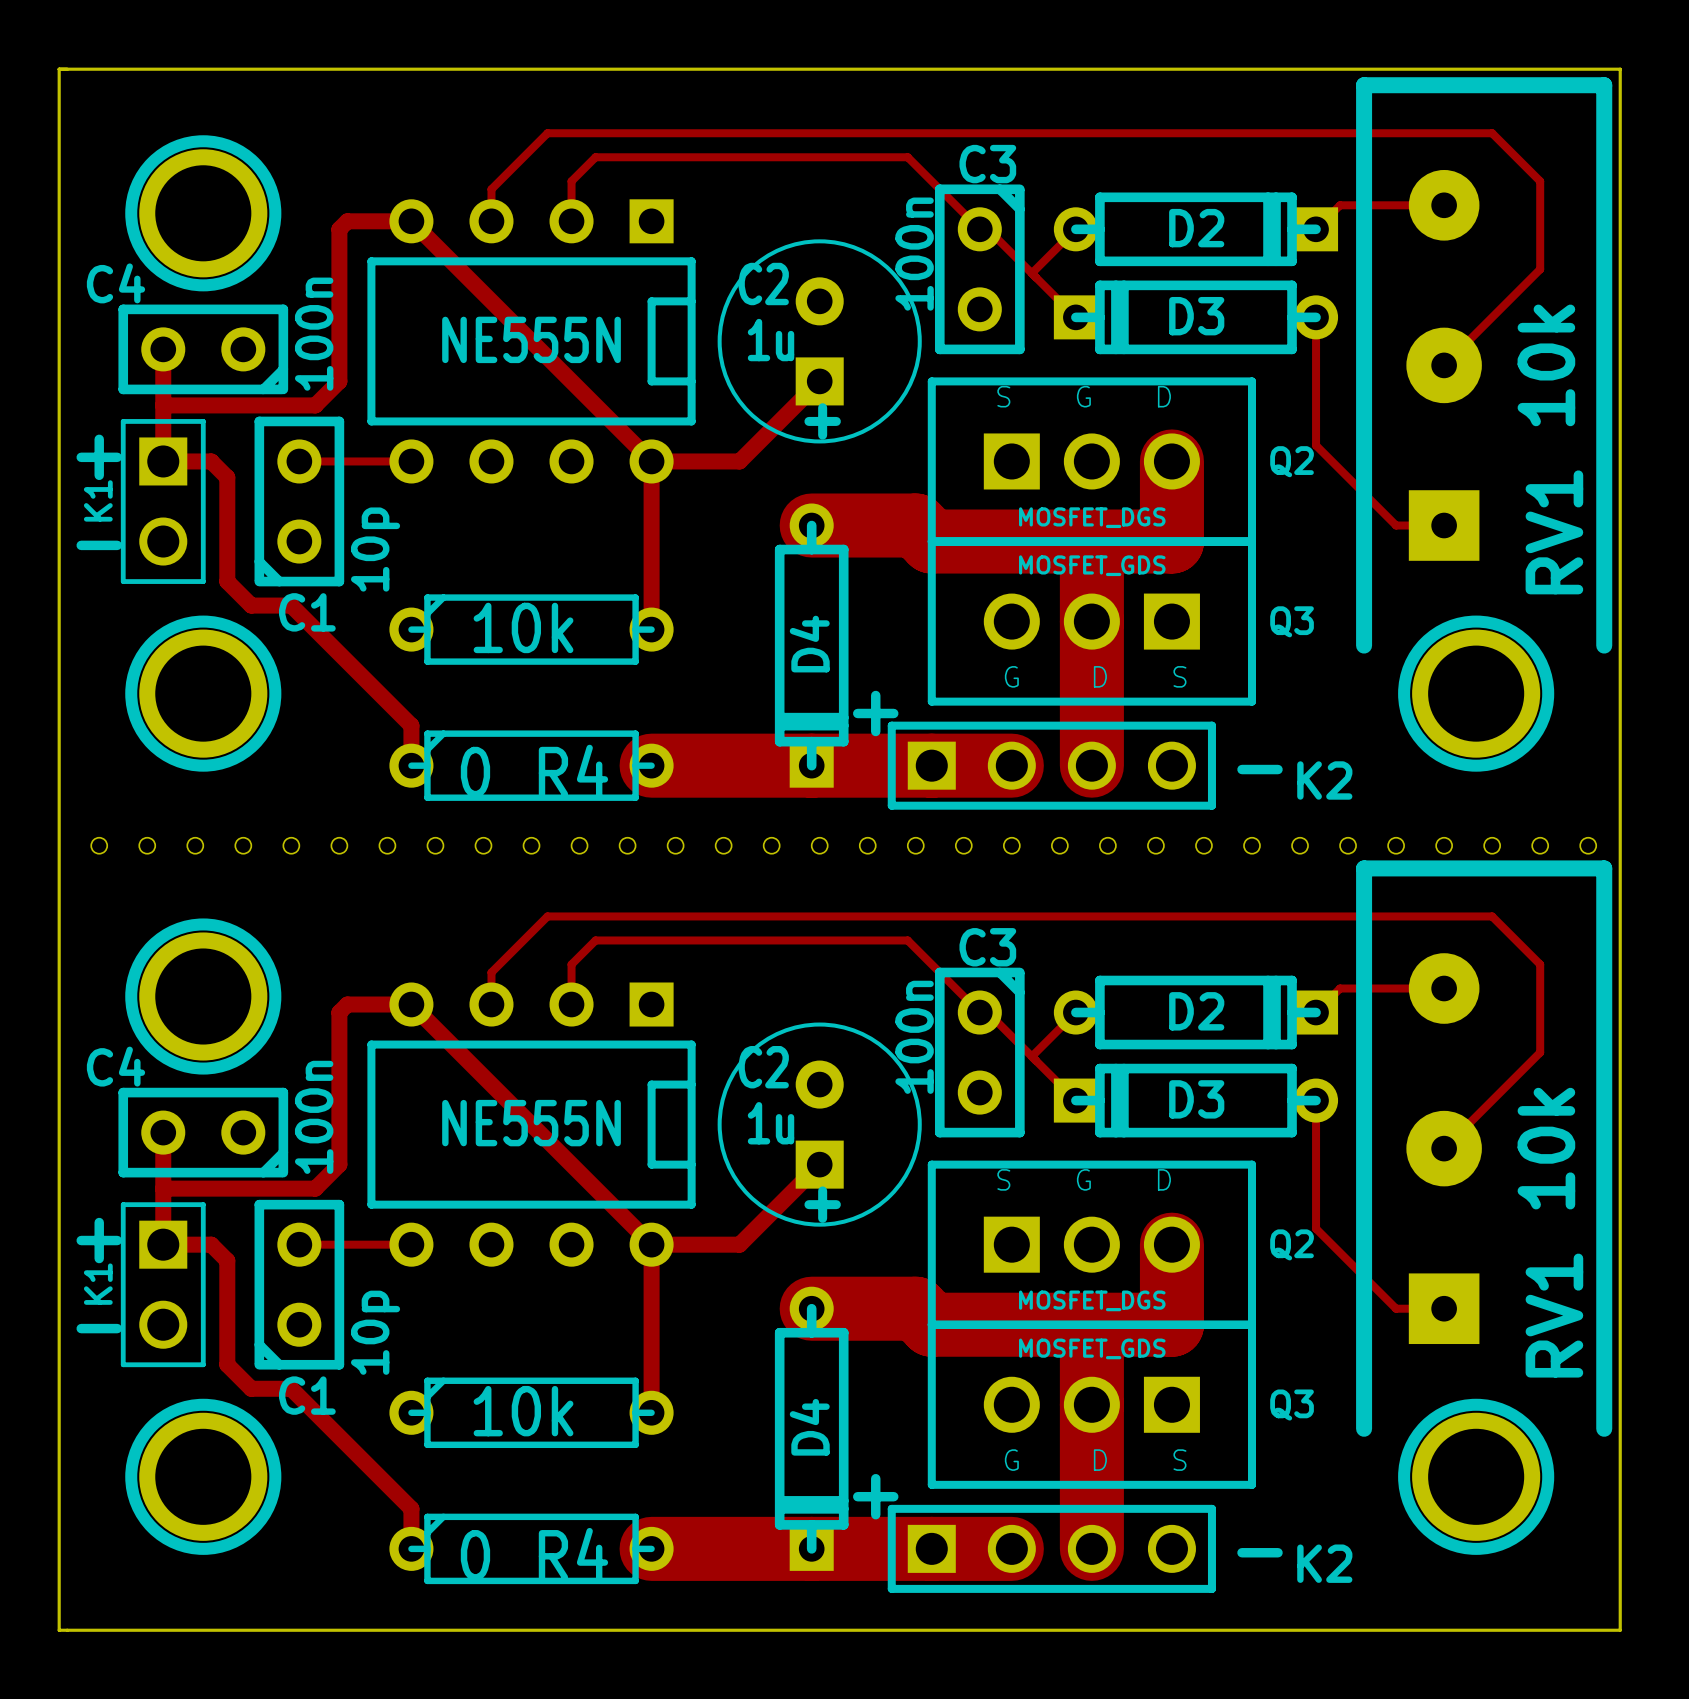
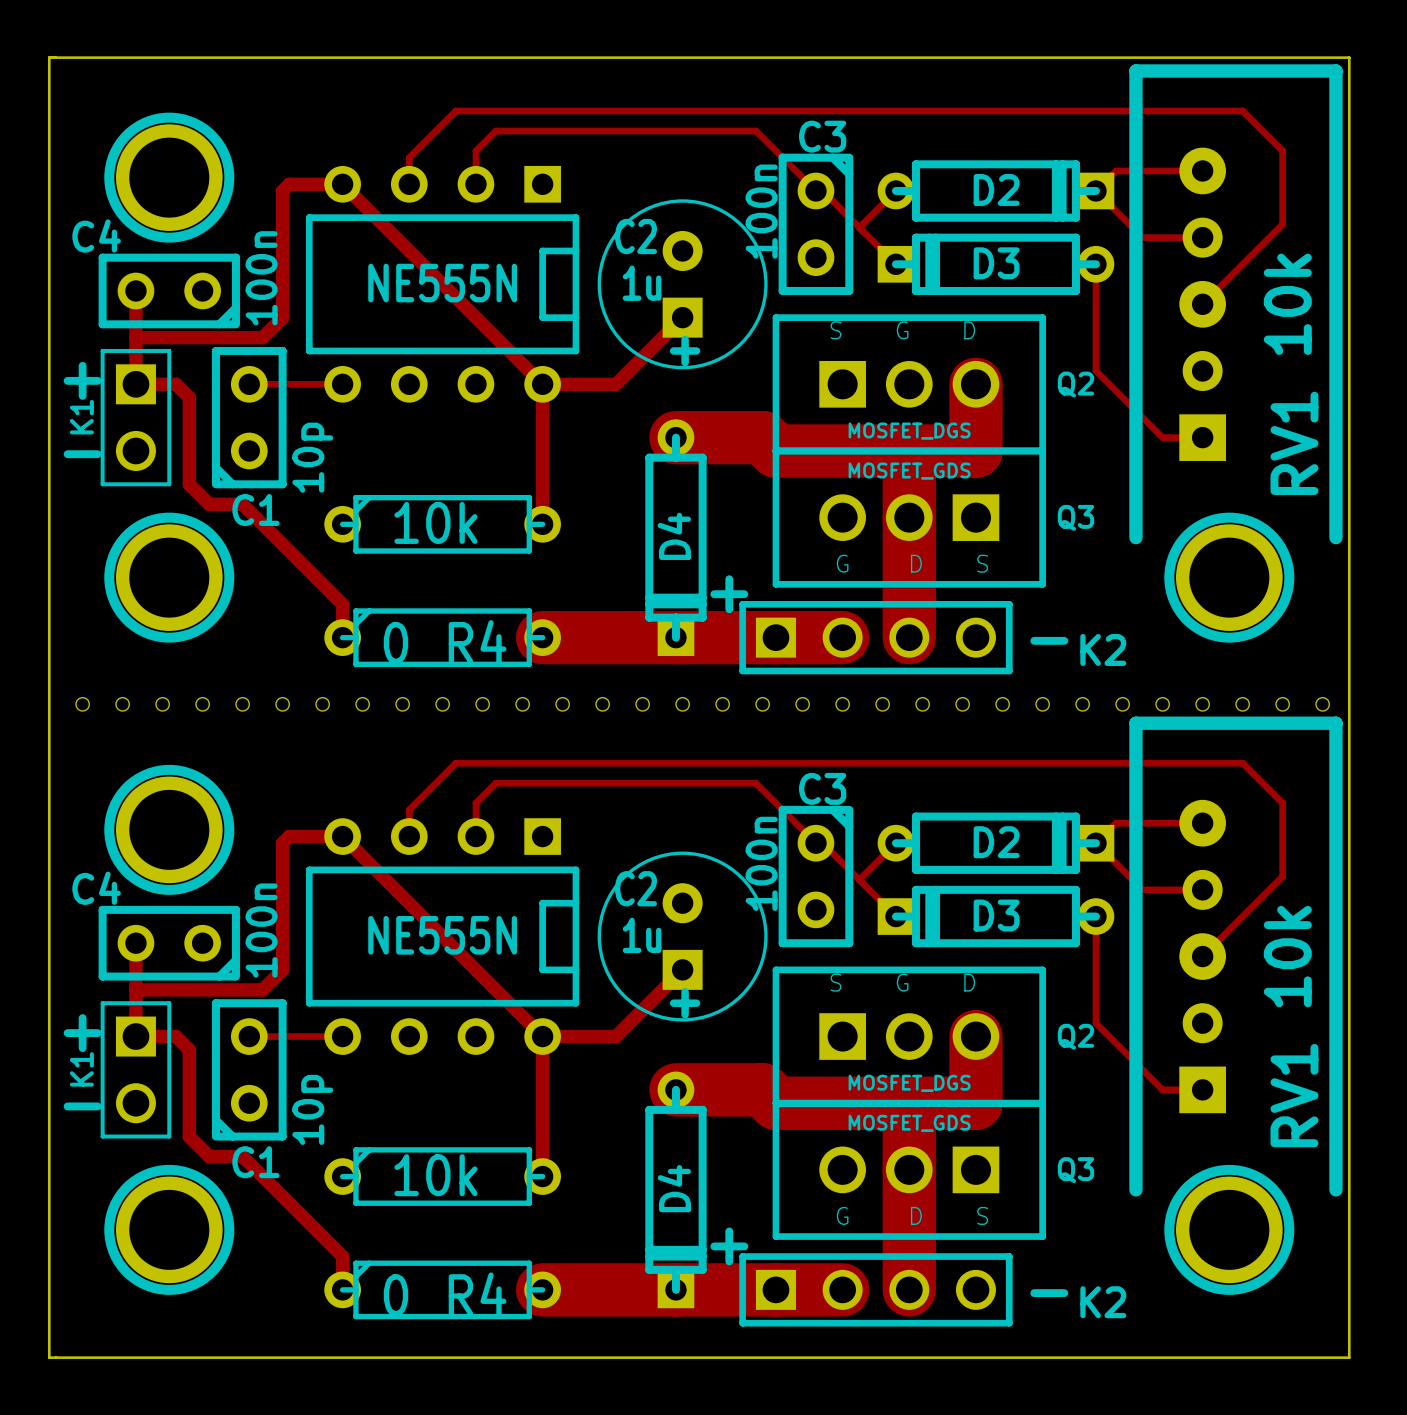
RV1 footprint: [1356, 77, 1613, 654] -> [1129, 64, 1343, 545]
track: none -> (1095, 190) (1142, 237) (1202, 237)
RV1 footprint: [1356, 860, 1613, 1437] -> [1129, 716, 1343, 1197]
track: none -> (1095, 843) (1142, 889) (1202, 889)

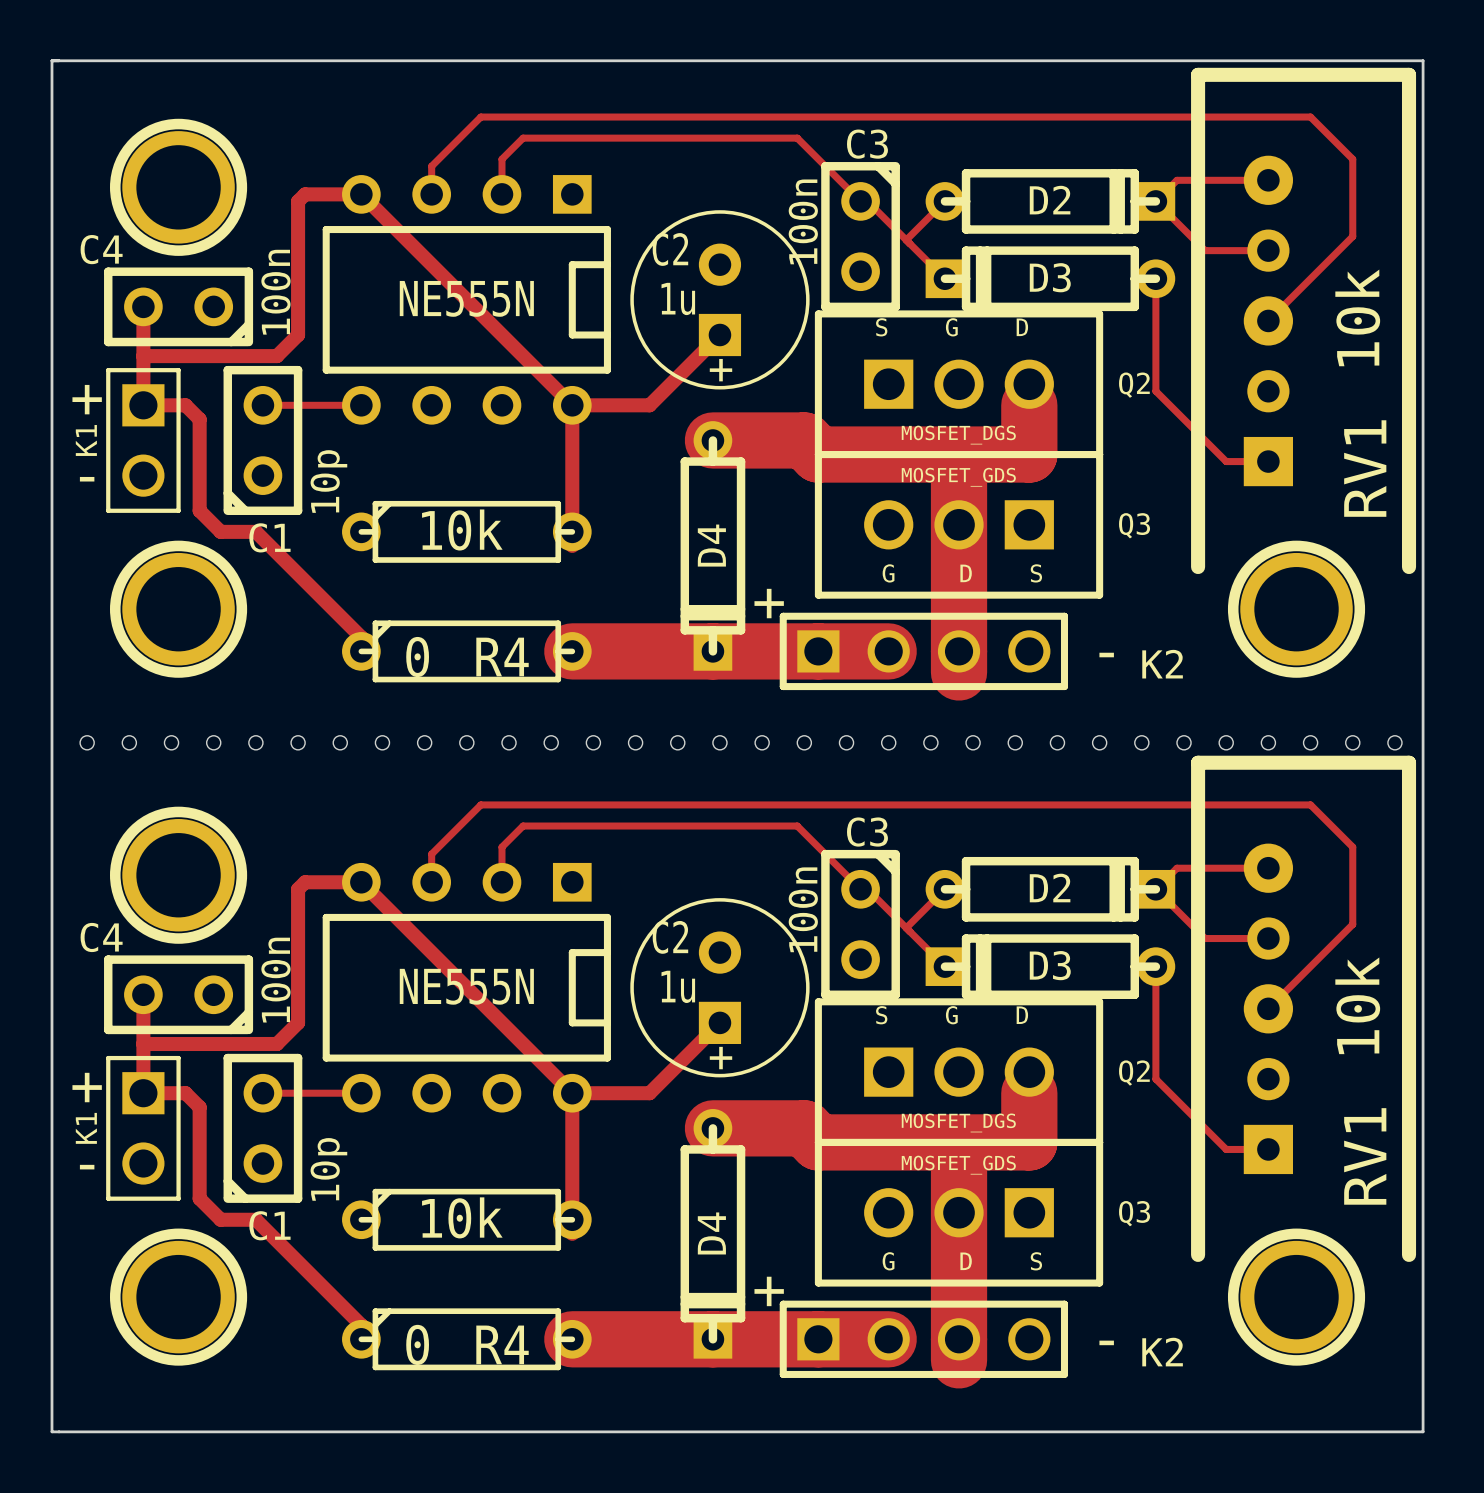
Q2 position: (909, 384) -> (959, 384)
track: (975, 430) (975, 450) (775, 450) (762, 437) (675, 437) -> (1029, 454) (818, 454) (804, 440) (712, 440)
Q3 position: (909, 517) -> (959, 524)
part position: (442, 524) -> (466, 531)
D4 position: (675, 537) -> (712, 545)
text position: + (729, 594) -> + (769, 603)
R4 position: (442, 637) -> (466, 651)
track: (542, 637) (842, 637) -> (572, 651) (888, 651)
K2 position: (875, 637) -> (923, 651)
text position: - (1049, 640) -> - (1106, 655)
Q2 position: (909, 1036) -> (959, 1072)
track: (975, 1083) (975, 1103) (775, 1103) (762, 1089) (675, 1089) -> (1029, 1142) (818, 1142) (804, 1128) (712, 1128)
Q3 position: (909, 1169) -> (959, 1212)
part position: (442, 1176) -> (466, 1219)
D4 position: (675, 1189) -> (712, 1233)
text position: + (729, 1246) -> + (769, 1291)
R4 position: (442, 1289) -> (466, 1339)
track: (542, 1289) (842, 1289) -> (572, 1339) (888, 1339)
K2 position: (875, 1289) -> (923, 1339)
text position: - (1049, 1293) -> - (1106, 1342)

